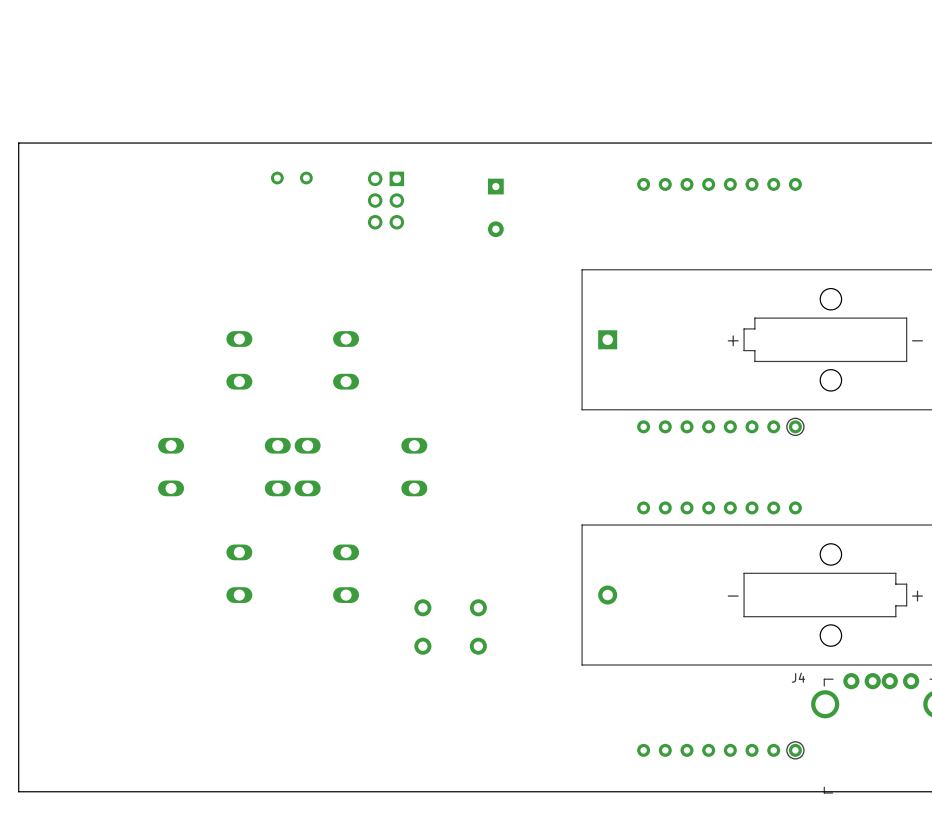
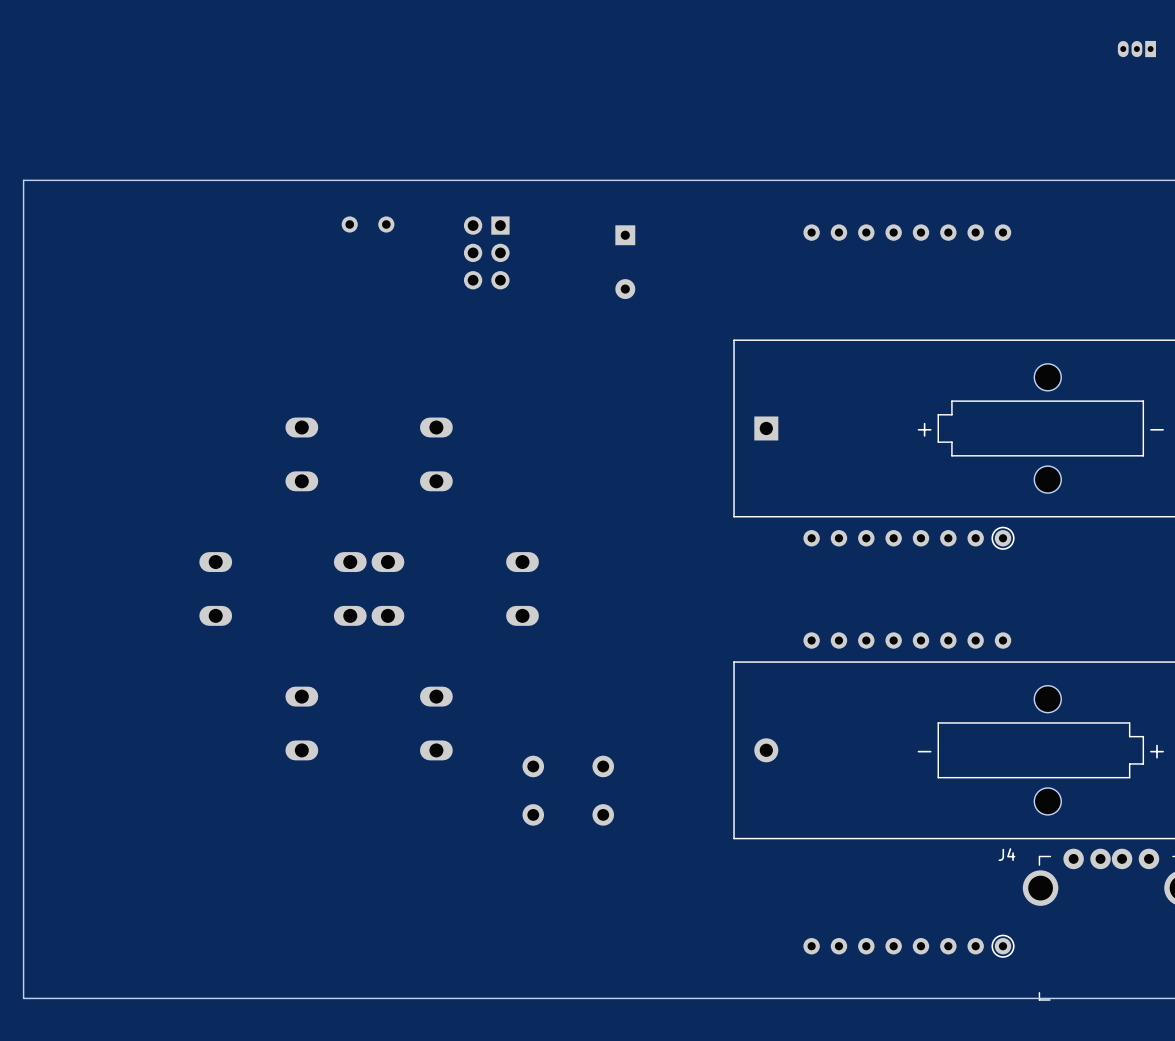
part: none -> (1136, 49)

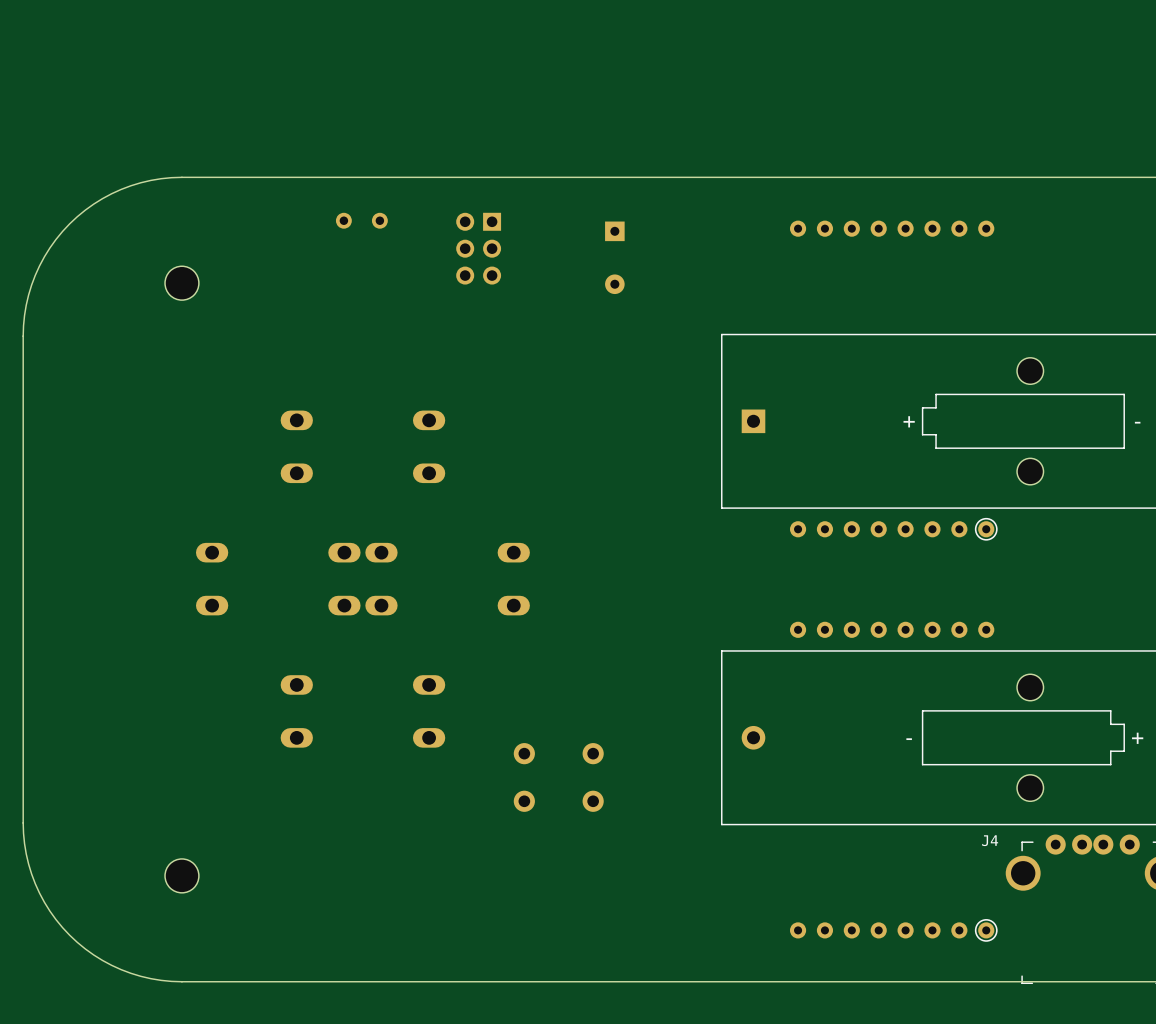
part: (1136, 49) -> none
board edge: (185, 180) (23, 180) (23, 341) -> (181, 177) (150, 180) (121, 189) (93, 204) (69, 223) (49, 247) (35, 275) (26, 305) (23, 336)
part: none -> (181, 283)
board edge: (23, 836) (23, 998) (185, 998) -> (23, 822) (26, 853) (35, 883) (49, 911) (69, 935) (93, 954) (121, 969) (150, 978) (181, 981)
part: none -> (181, 875)

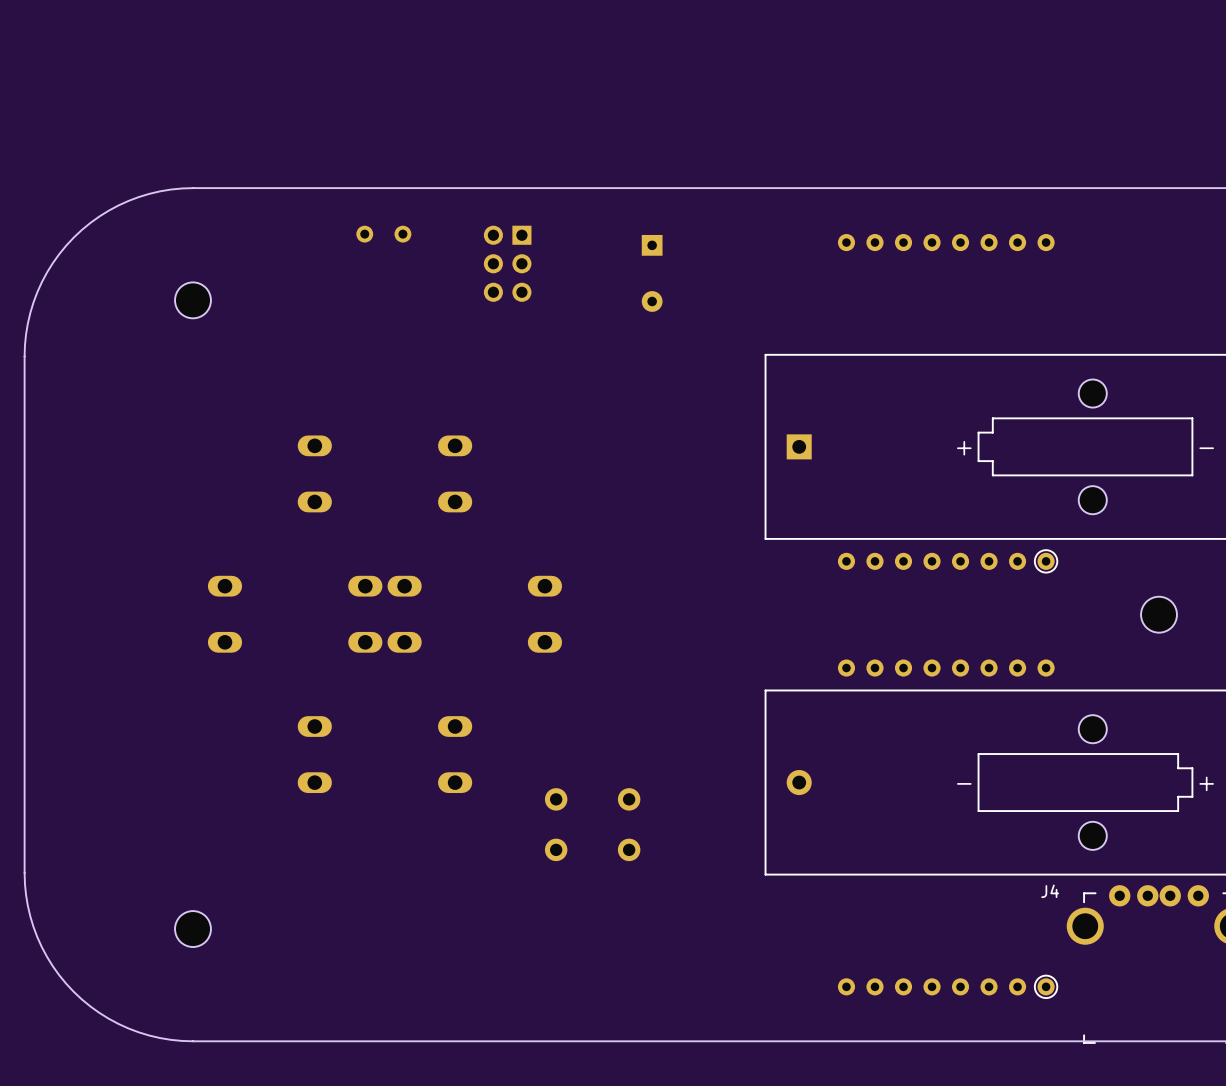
part: none -> (1159, 614)

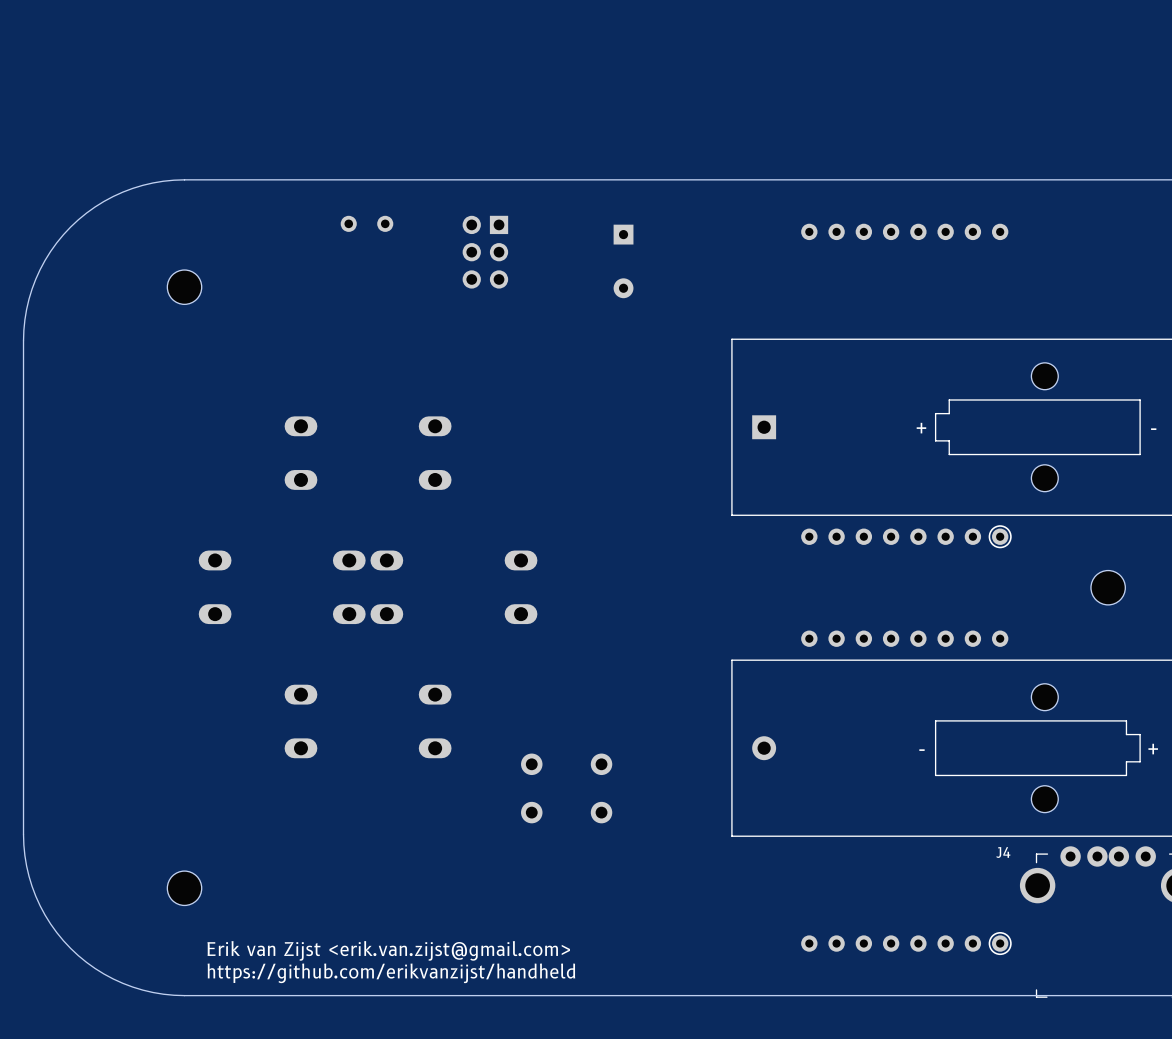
text: none -> Erik van Zijst <erik.van.zijst@gmail.com> (388, 950)
text: none -> https://github.com/erikvanzijst/handheld (391, 973)

